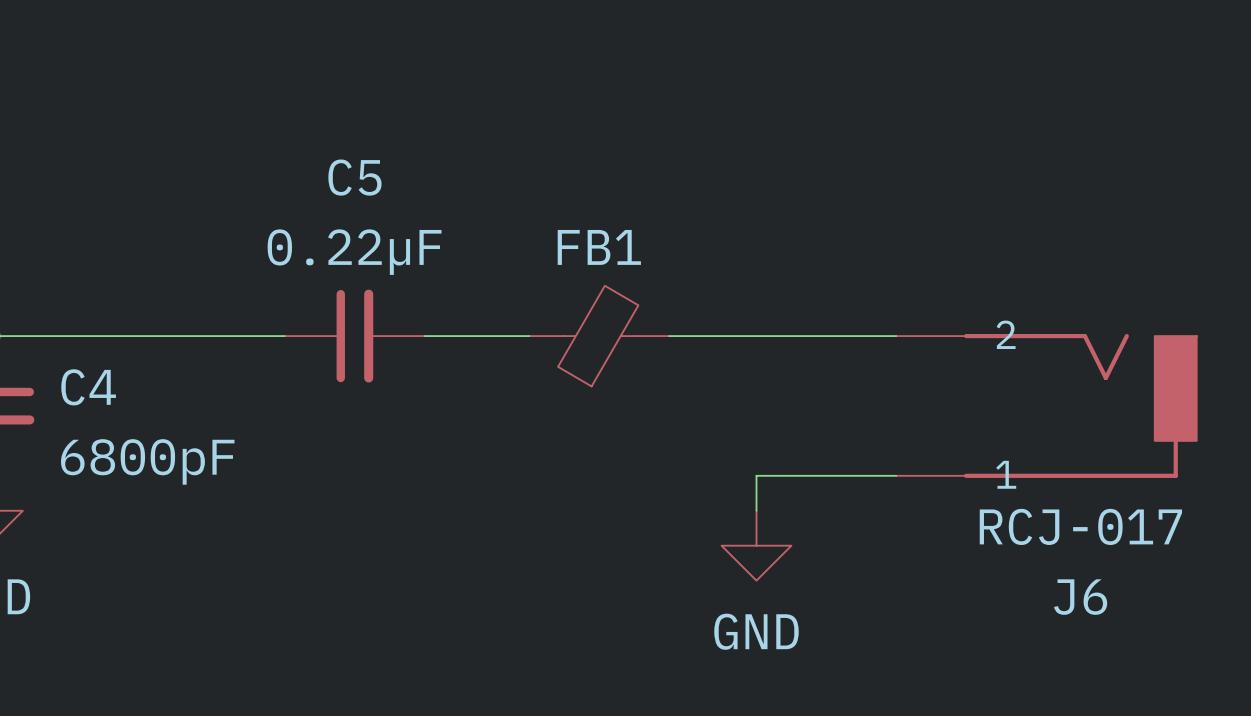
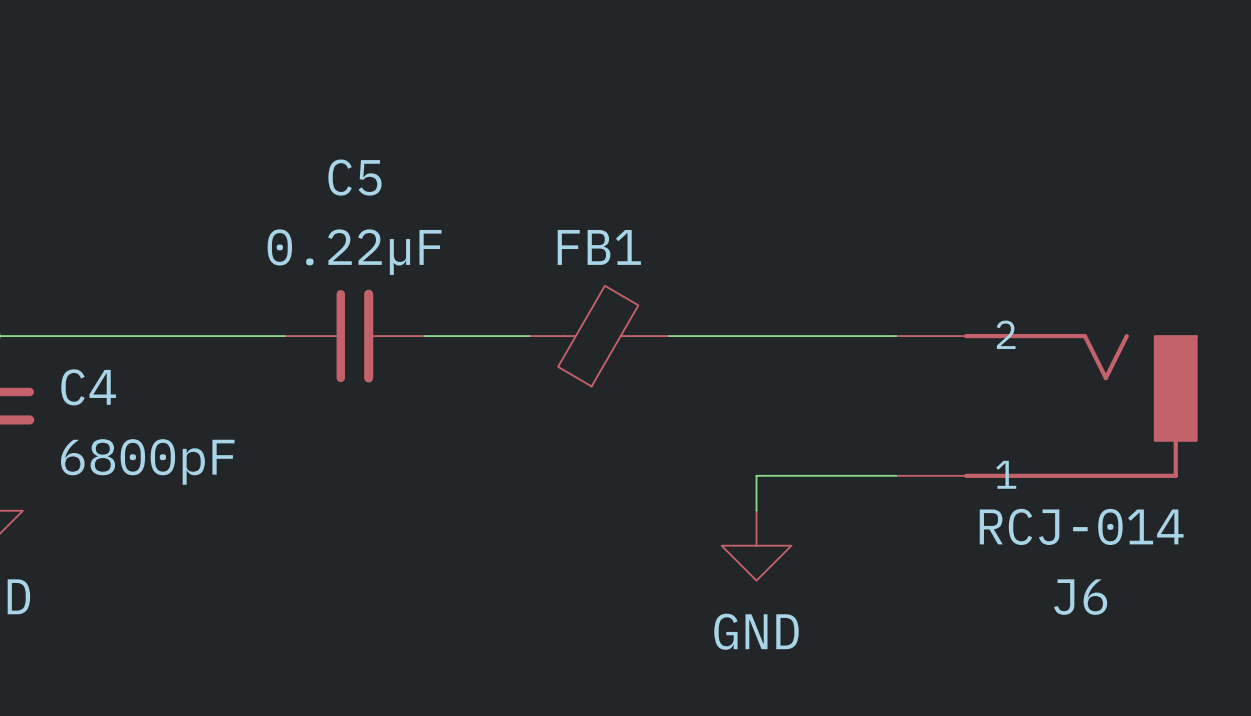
J6 value: RCJ-017 (1080, 526) -> RCJ-014 (1081, 526)

